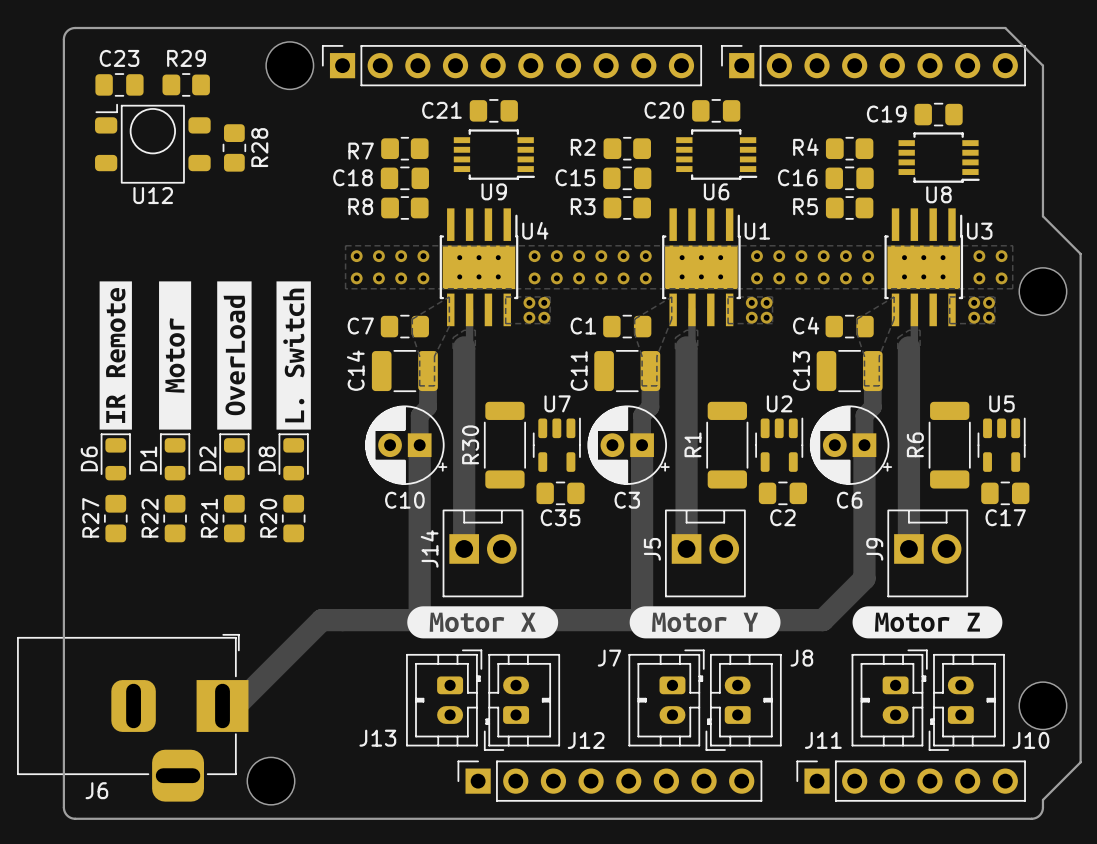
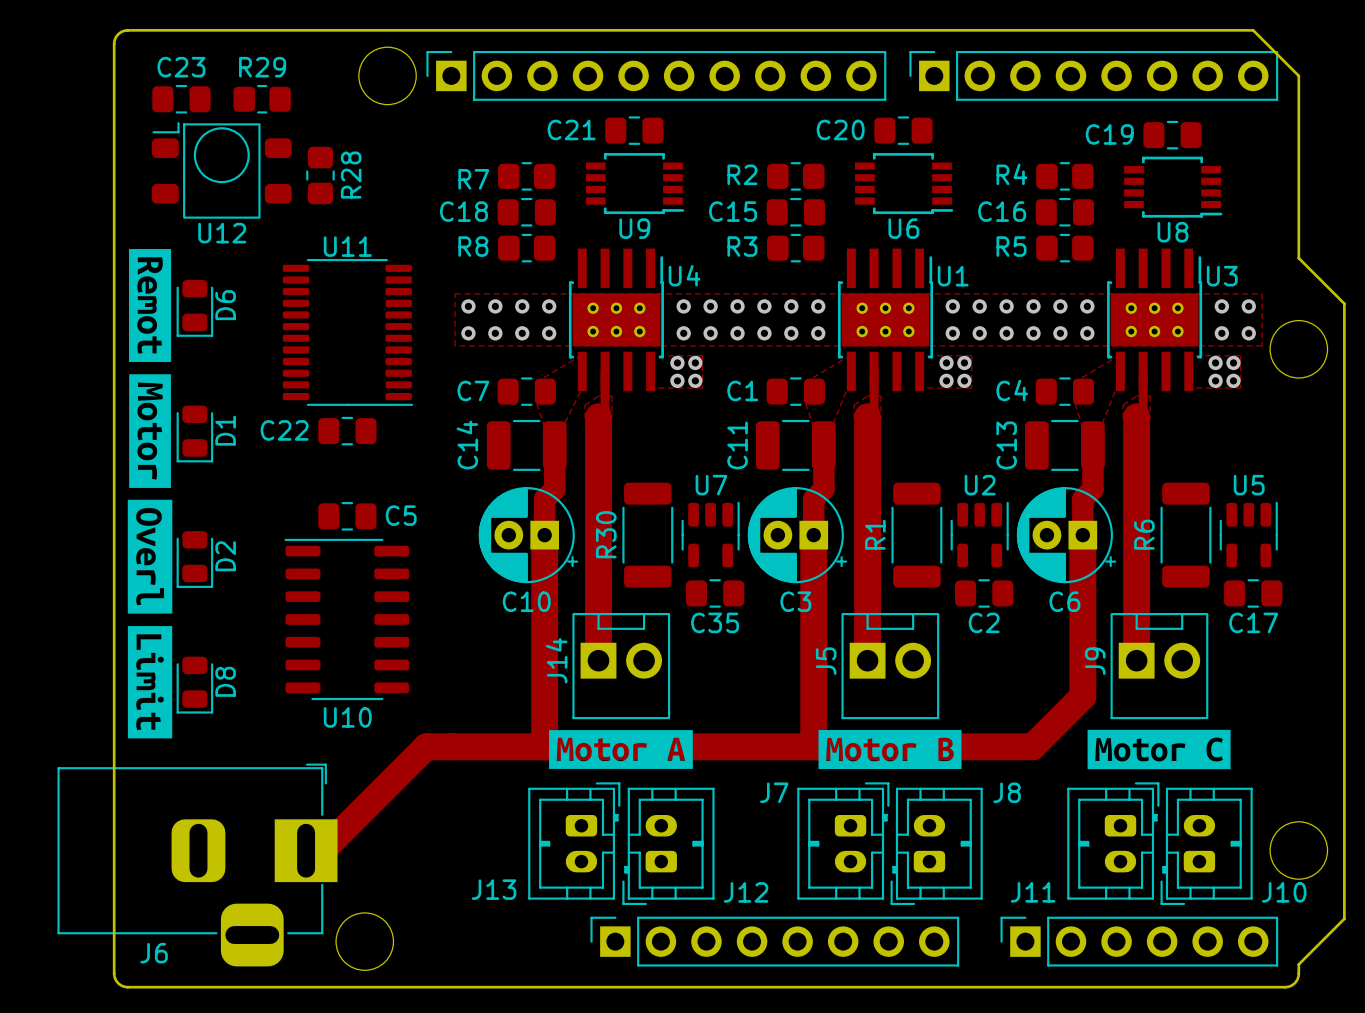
drawing: none -> [127, 249, 173, 739]
U11: none -> (347, 332)
drawing: [99, 281, 132, 430] -> none
drawing: [159, 281, 192, 430] -> none
drawing: [217, 281, 252, 430] -> none
drawing: [276, 281, 311, 430] -> none
C22: none -> (347, 431)
C5: none -> (347, 516)
D6 rotation: 0° (115, 456) -> 180° (194, 308)
D6 position: (115, 456) -> (194, 308)
D1 rotation: 0° (175, 456) -> 180° (194, 433)
D1 position: (175, 456) -> (194, 433)
D2 rotation: 0° (234, 456) -> 180° (194, 559)
D2 position: (234, 456) -> (194, 559)
D8 rotation: 0° (293, 456) -> 180° (194, 685)
D8 position: (293, 456) -> (194, 685)
U10: none -> (346, 619)
R27: (115, 518) -> none
R22: (175, 518) -> none
R21: (234, 518) -> none
R20: (293, 518) -> none
drawing shape: [407, 606, 559, 639] -> [549, 730, 693, 769]
drawing shape: [629, 606, 781, 639] -> [818, 729, 962, 770]
drawing shape: [852, 606, 1003, 639] -> [1087, 729, 1231, 770]

